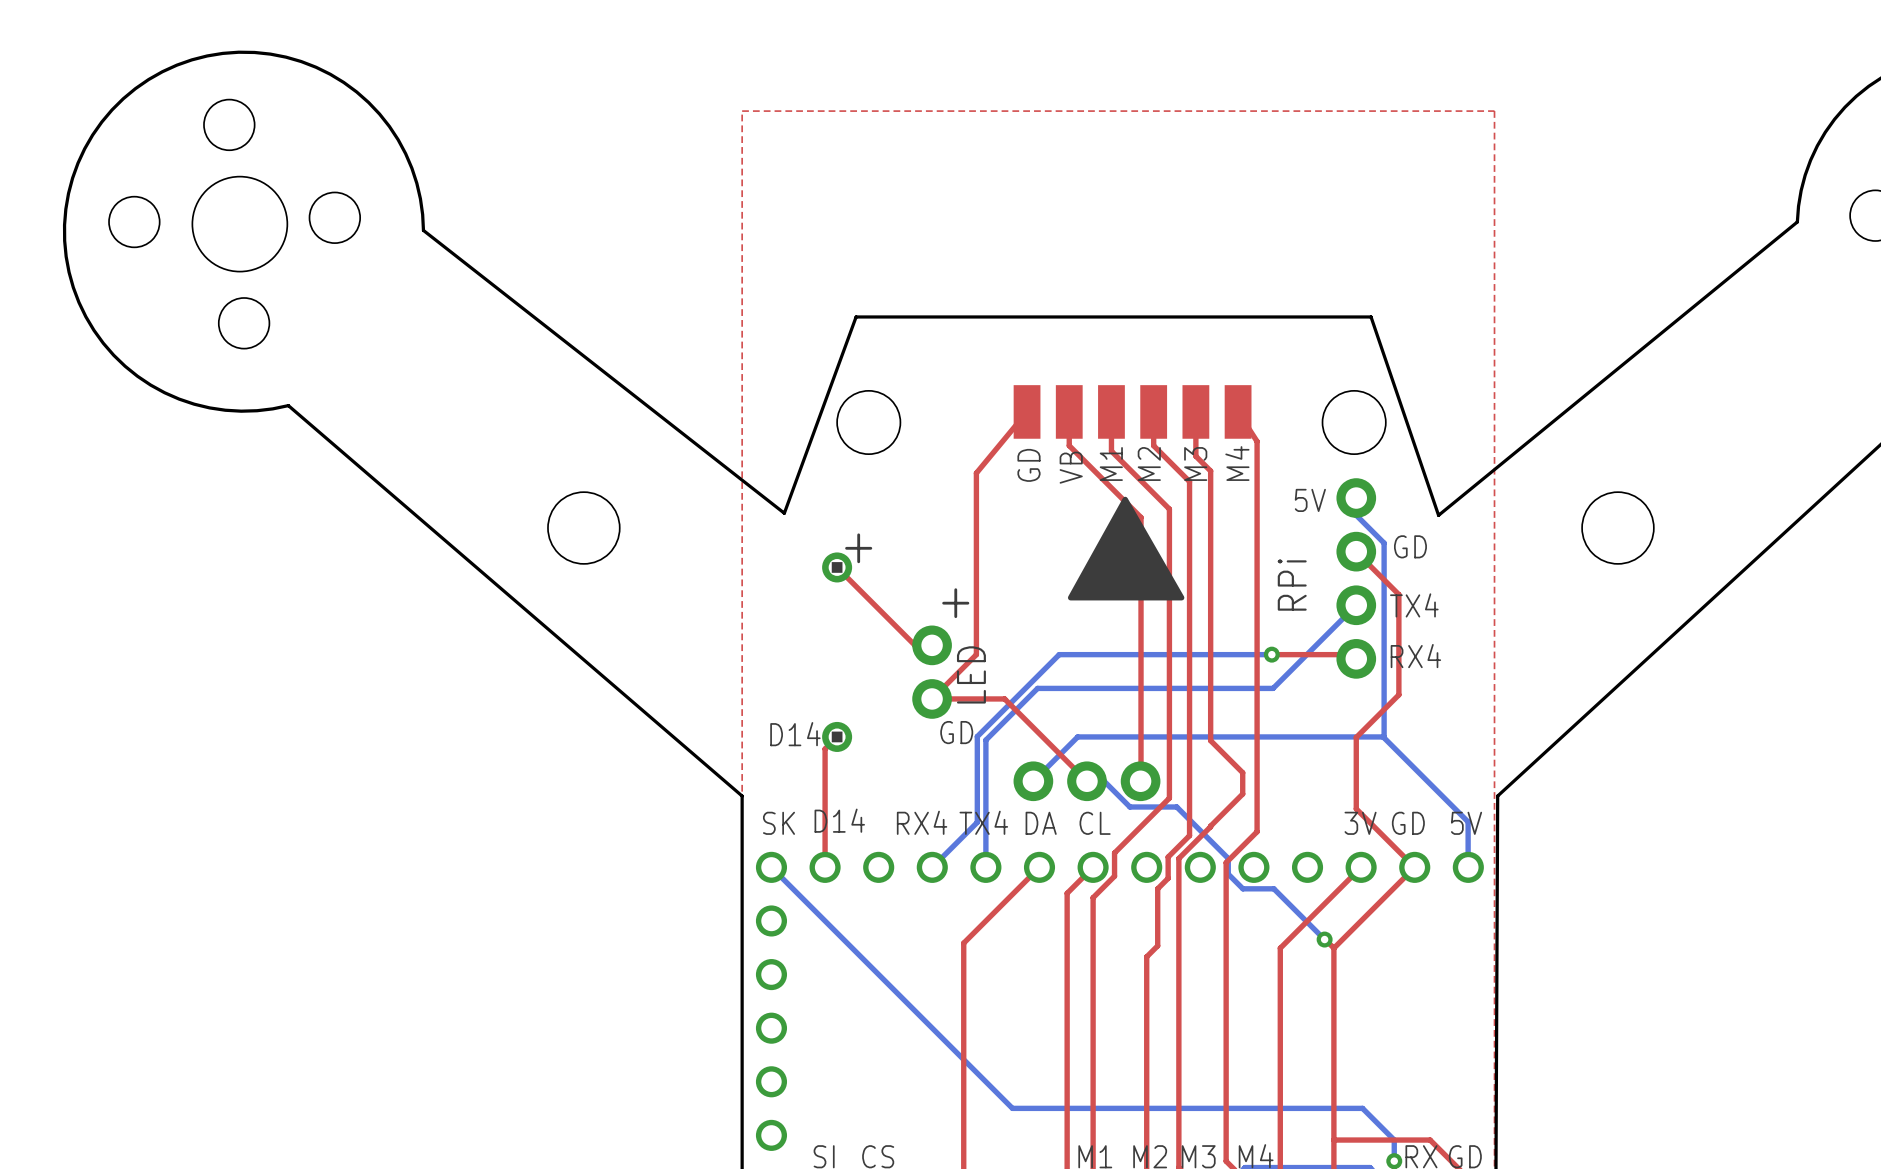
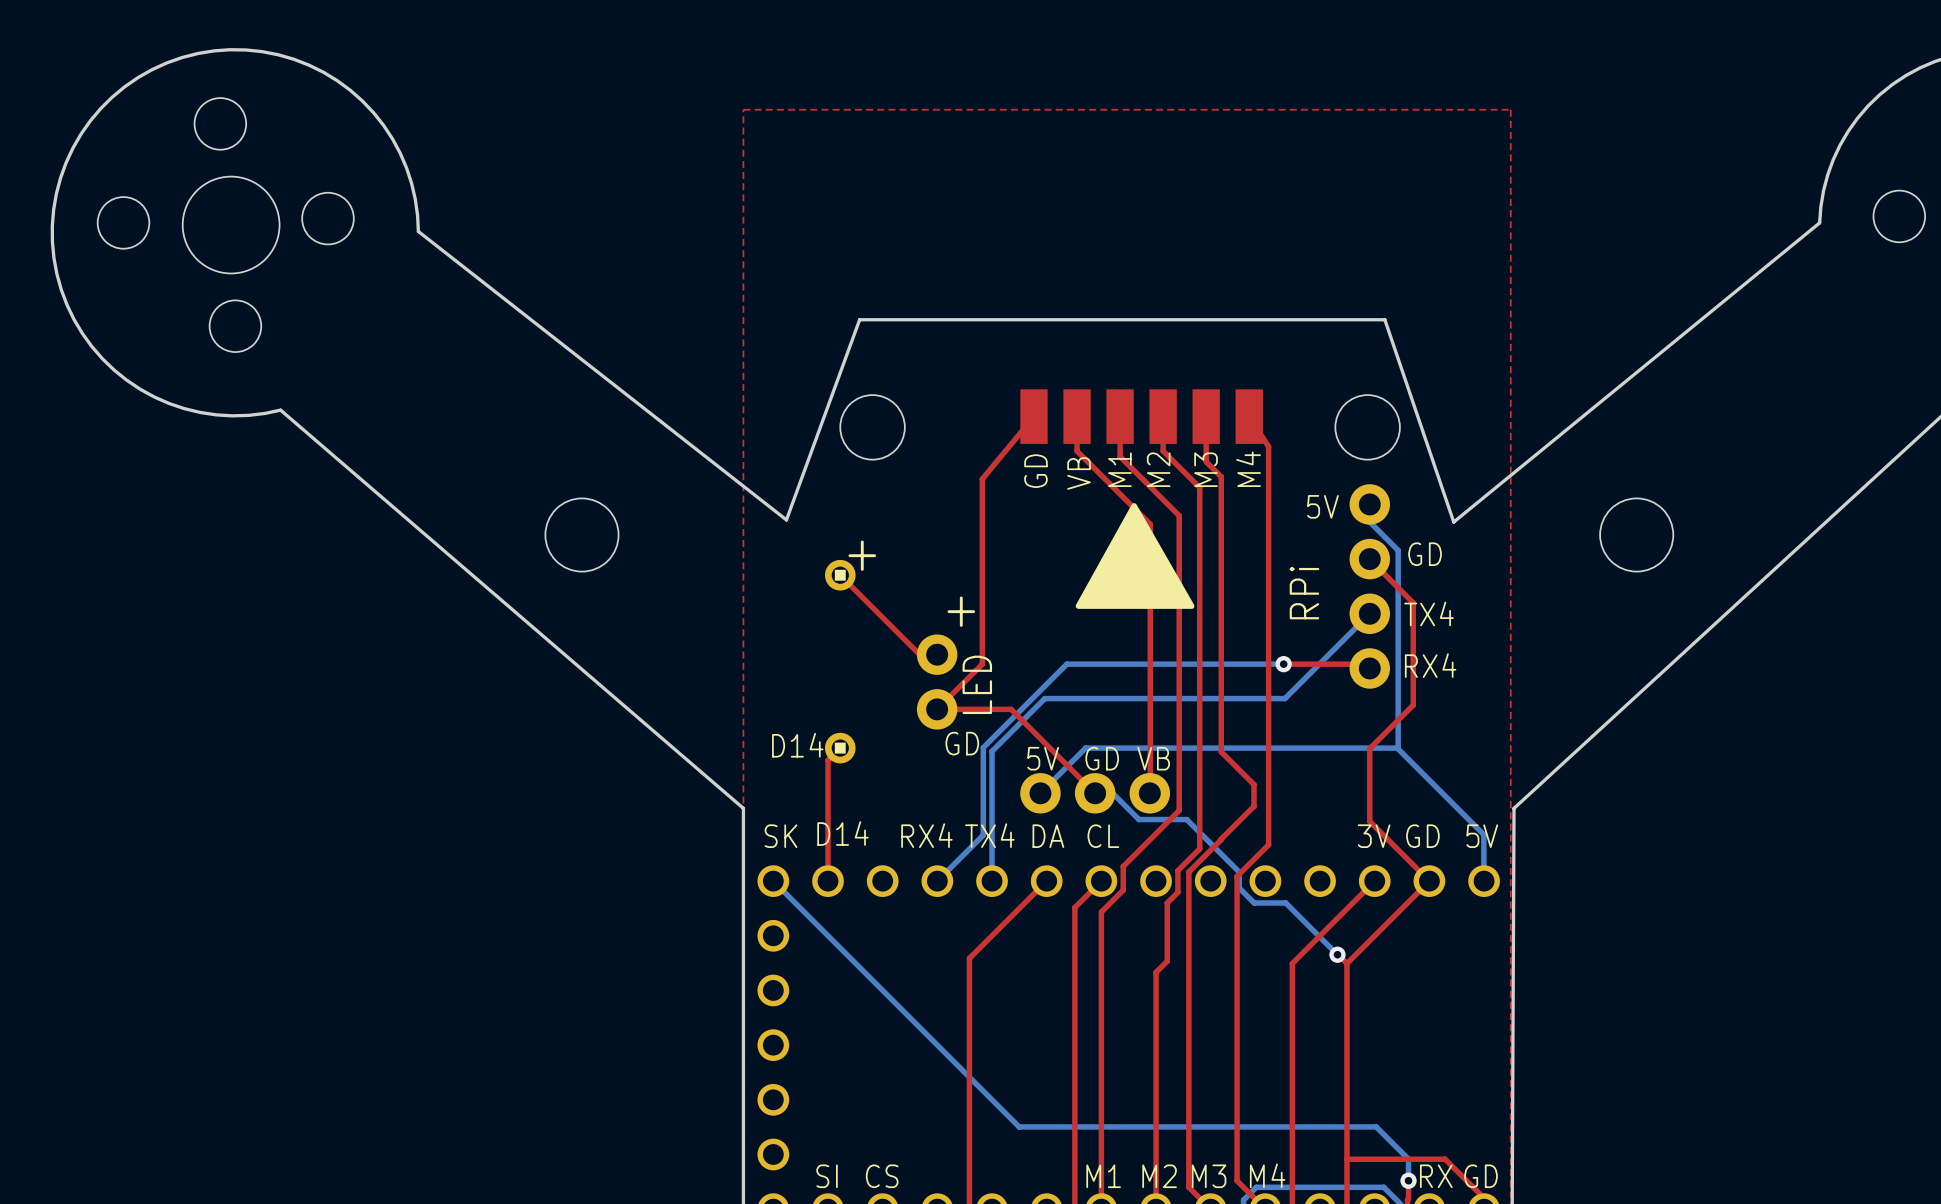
text: none -> 5V (1043, 758)
text: none -> GD (1102, 758)
text: none -> VB (1153, 758)

